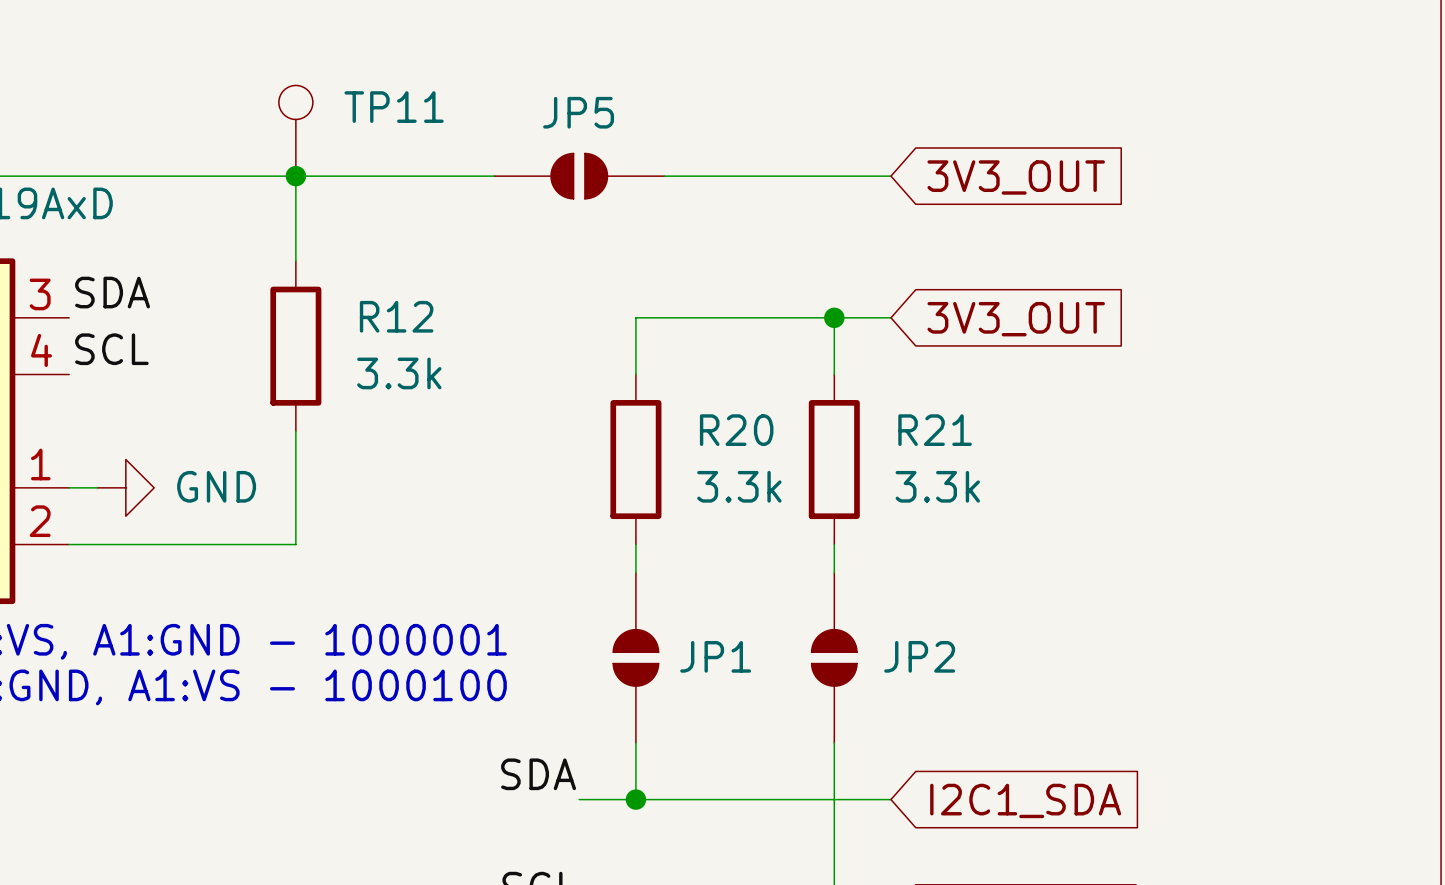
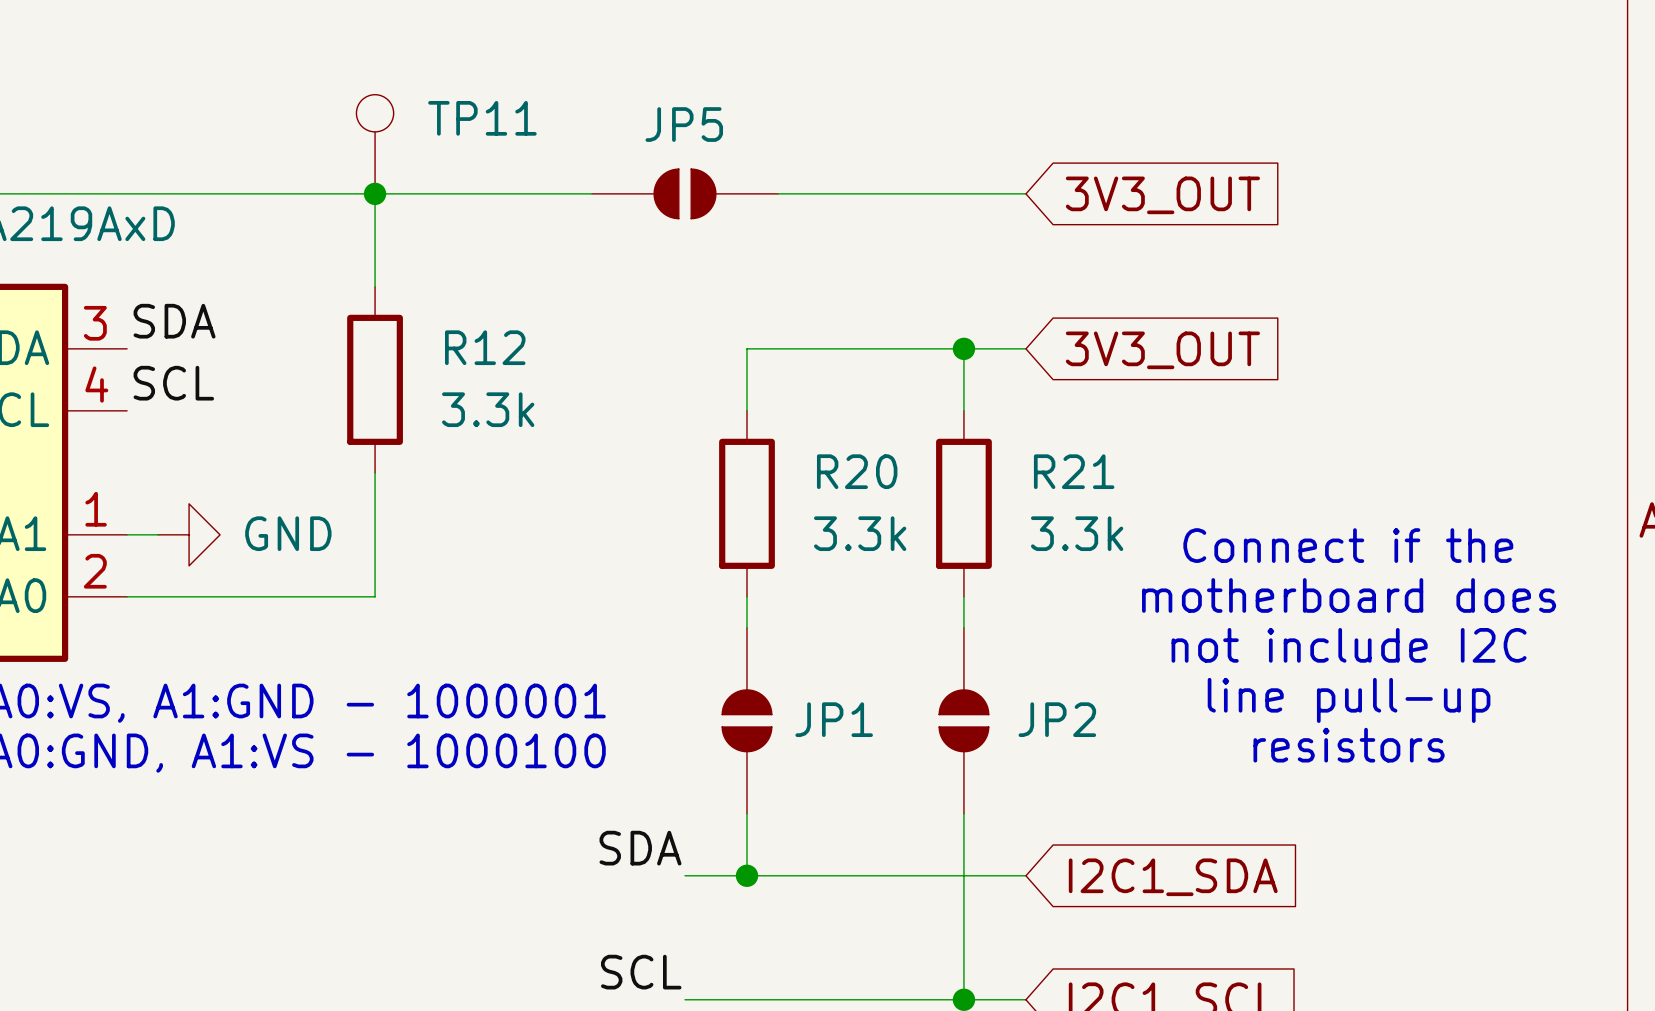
text: none -> Connect if the (1348, 545)
text: none -> motherboard does (1349, 595)
text: none -> not include I2C (1349, 645)
text: none -> line pull-up (1349, 700)
text: none -> resistors (1349, 745)

